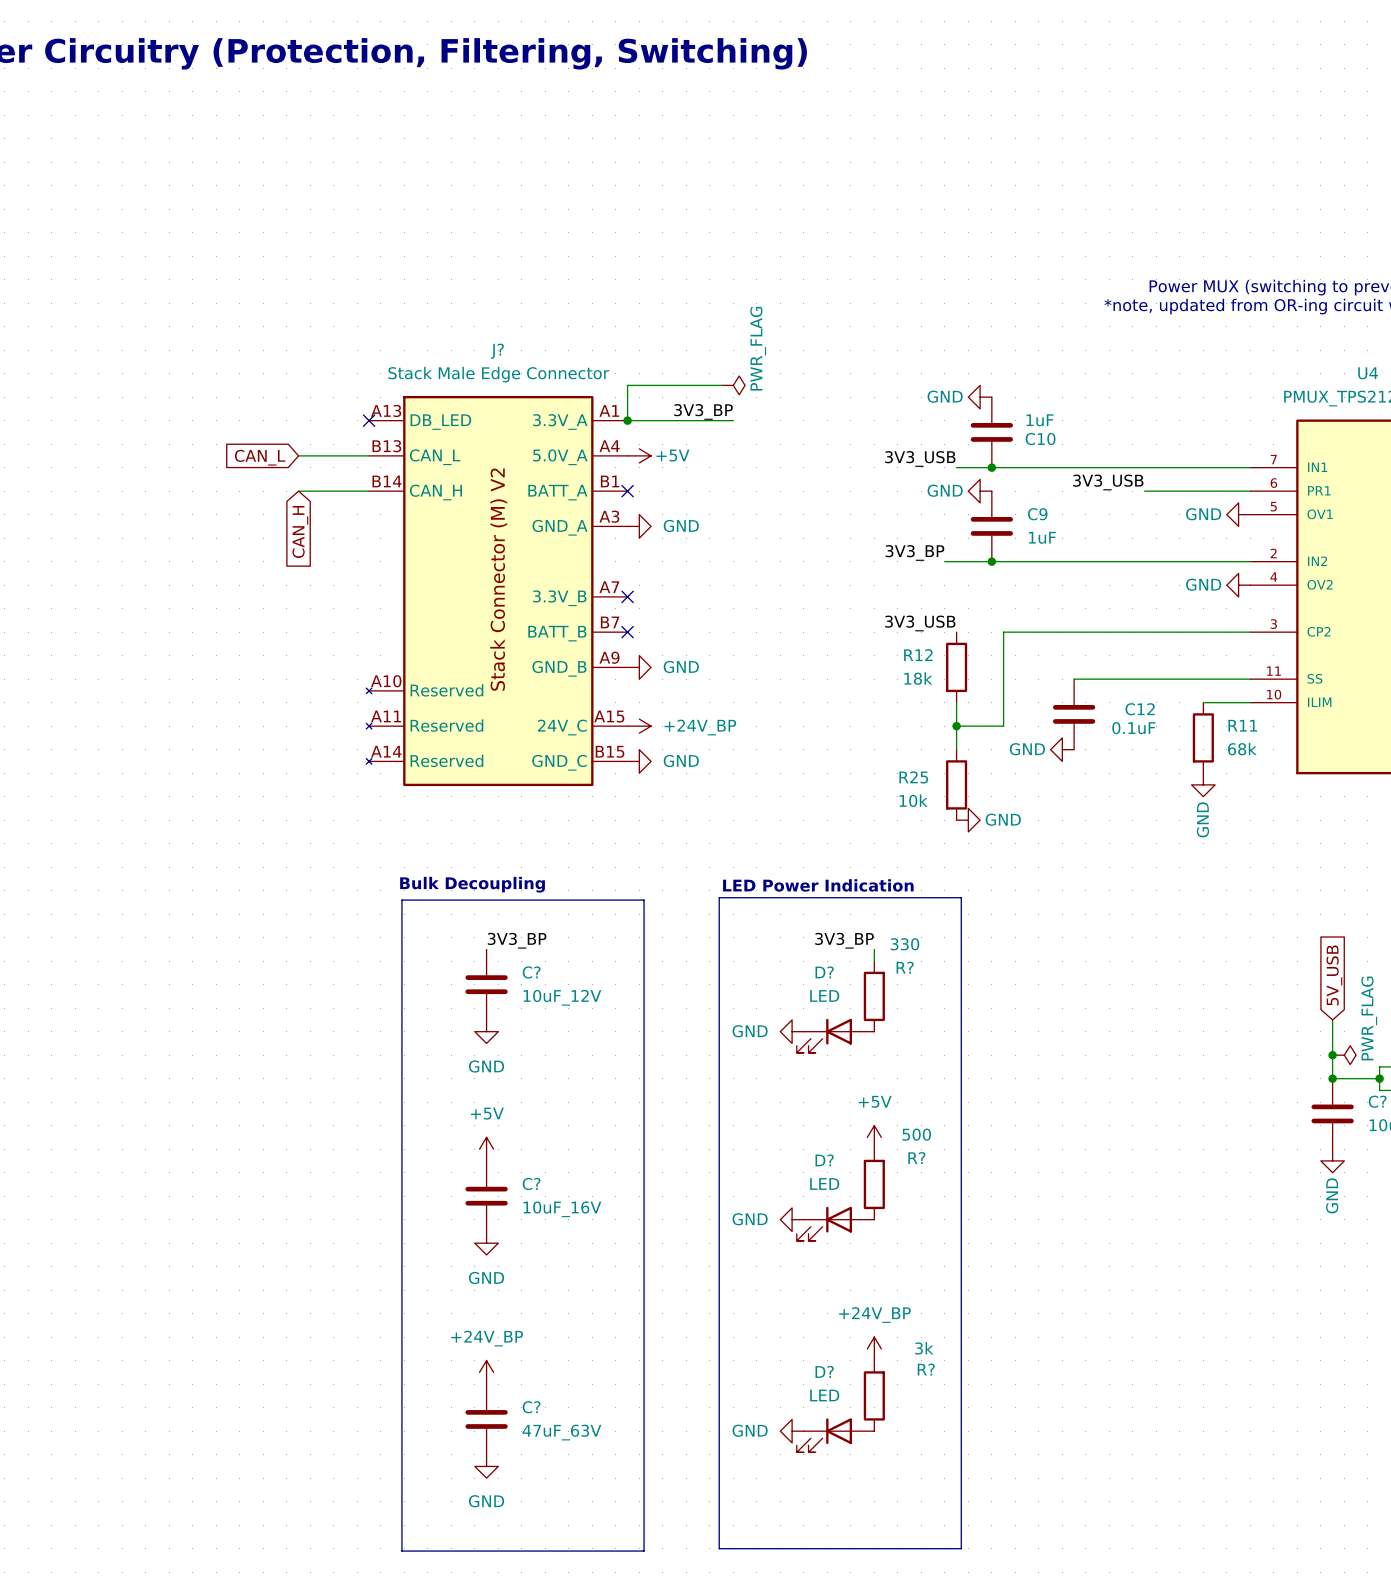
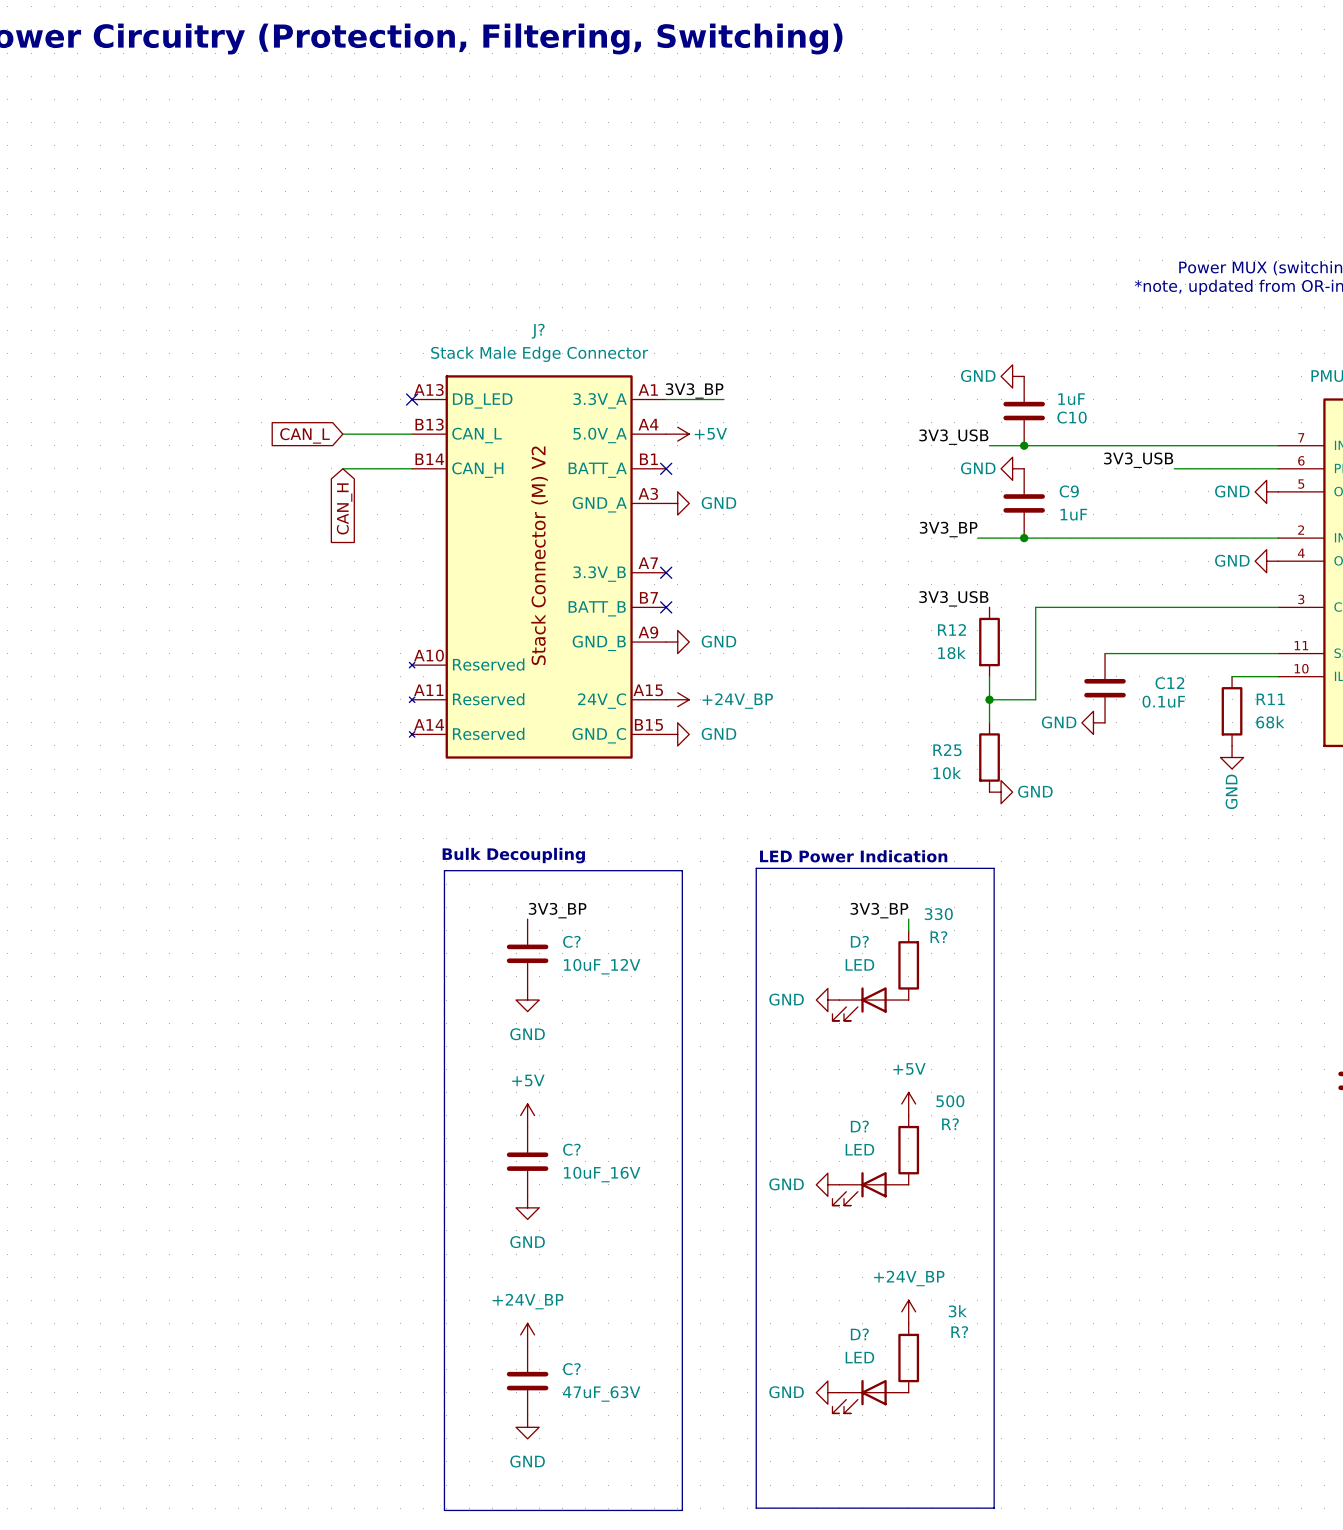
wire: (721, 385) (627, 385) (627, 420) -> none
power symbol: PWR_FLAG (733, 385) -> none
label position: 3V3_BP (703, 411) -> 3V3_BP (694, 390)
junction: (627, 420) -> none
wire: (686, 420) (733, 420) -> none

